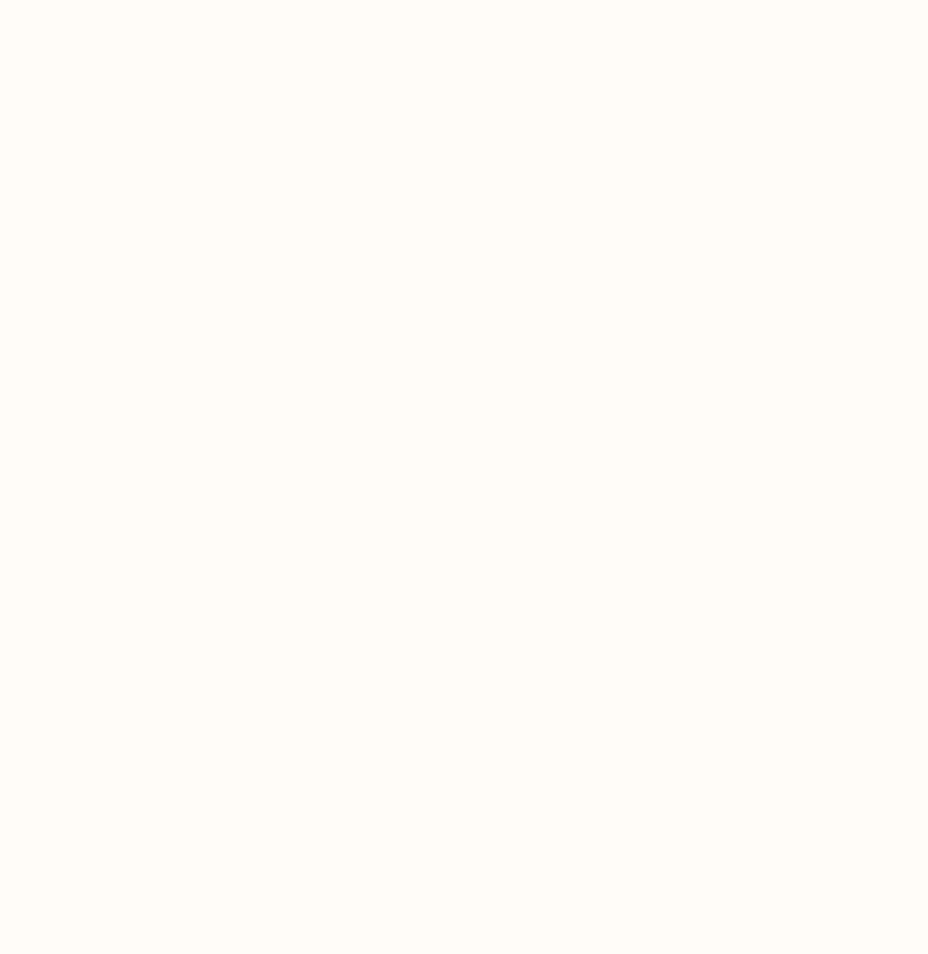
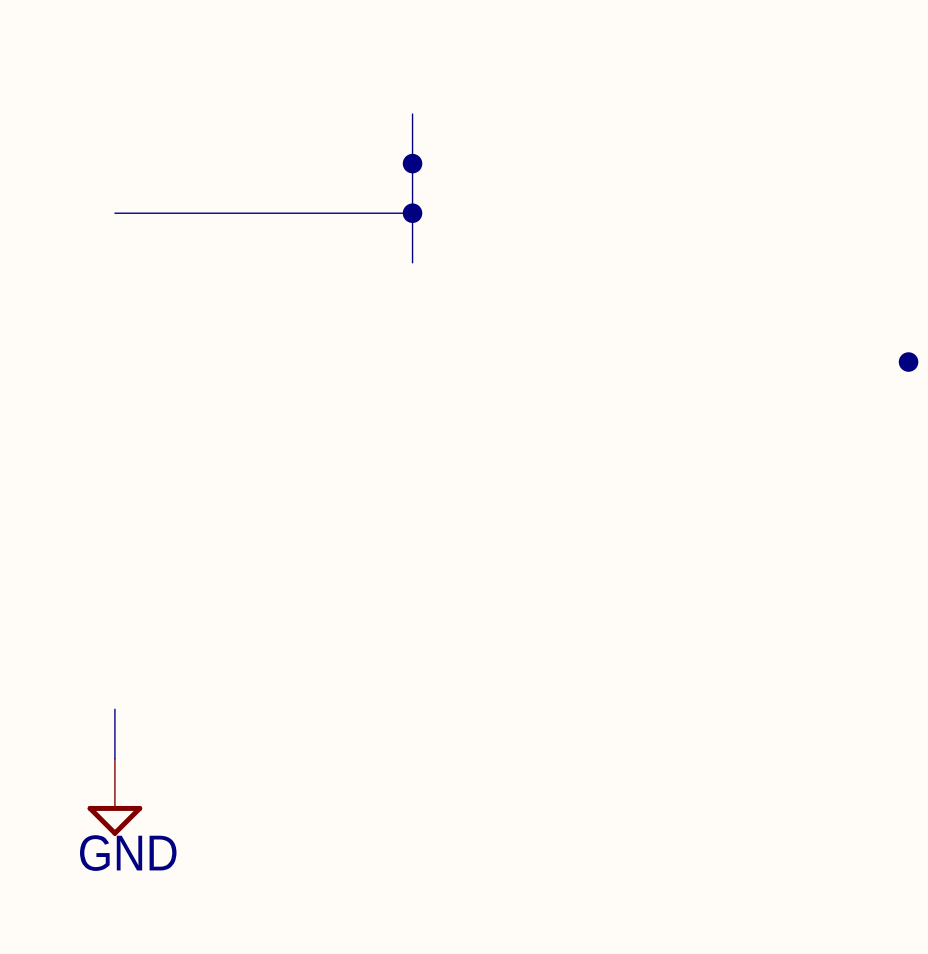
wire: none -> (412, 114) (412, 262)
junction: none -> (412, 163)
wire: none -> (114, 213) (412, 213)
junction: none -> (412, 213)
junction: none -> (908, 362)
wire: none -> (114, 709) (114, 758)
power symbol: none -> GND (114, 797)

